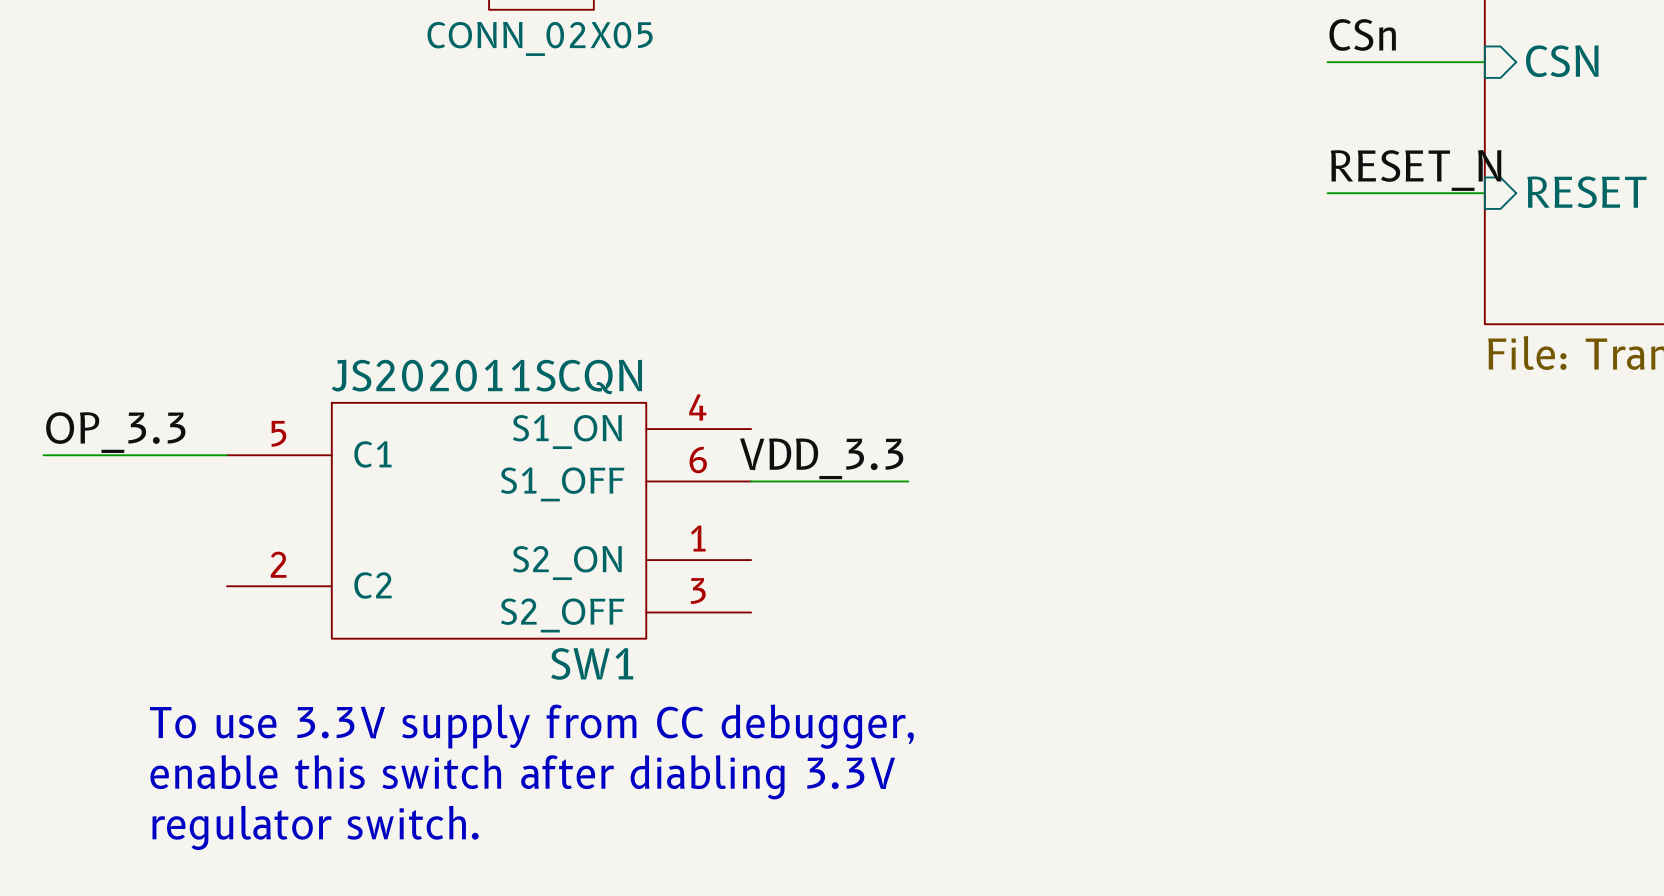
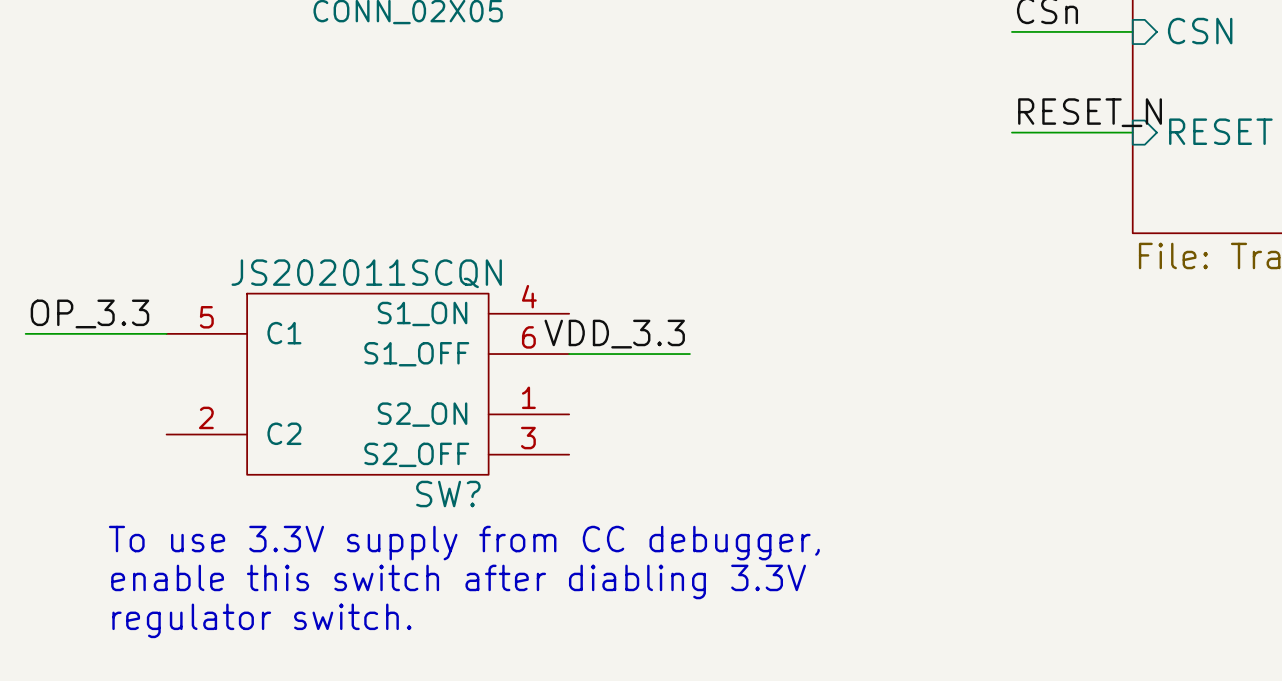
SW1 name: SW1 (592, 663) -> SW? (448, 494)

